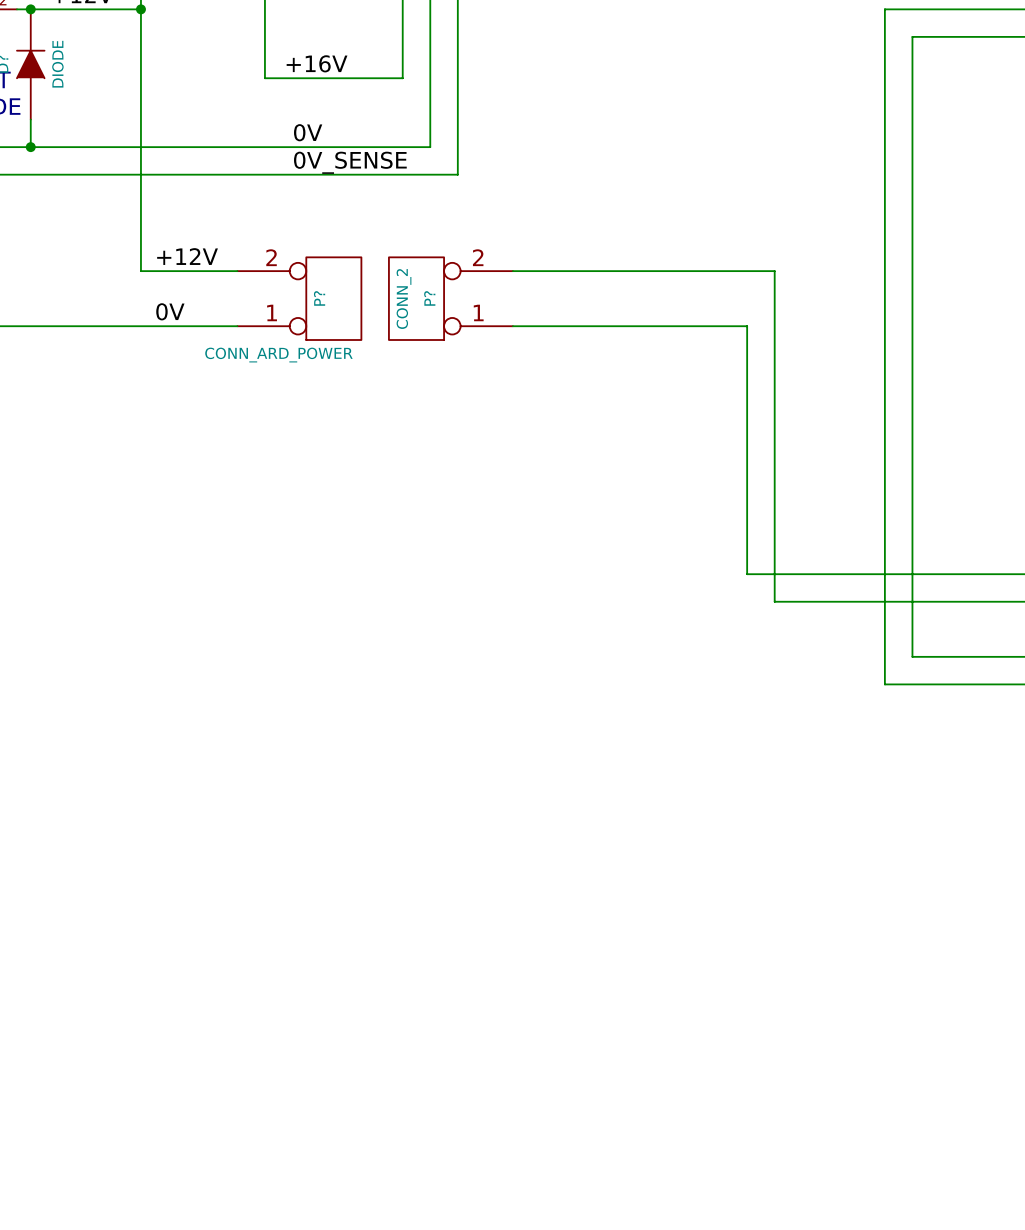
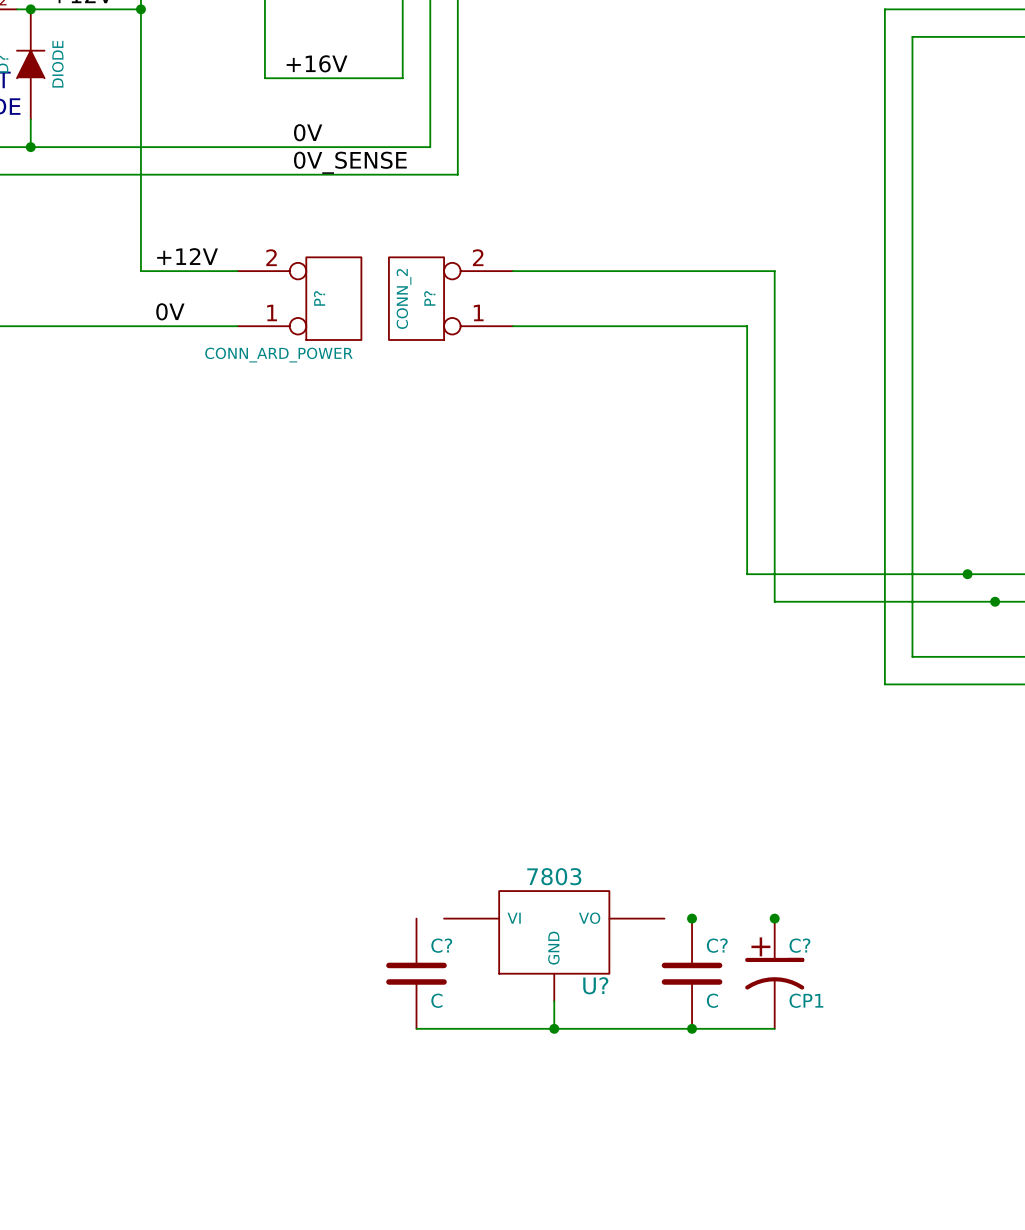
junction: none -> (967, 574)
junction: none -> (995, 601)
junction: none -> (692, 918)
junction: none -> (774, 918)
U?: none -> 7803 (554, 946)
C?: none -> C (416, 973)
C?: none -> C (692, 973)
C?: none -> CP1 (774, 973)
wire: none -> (554, 1001) (554, 1028)
wire: none -> (416, 1028) (774, 1028)
junction: none -> (554, 1028)
junction: none -> (692, 1028)

